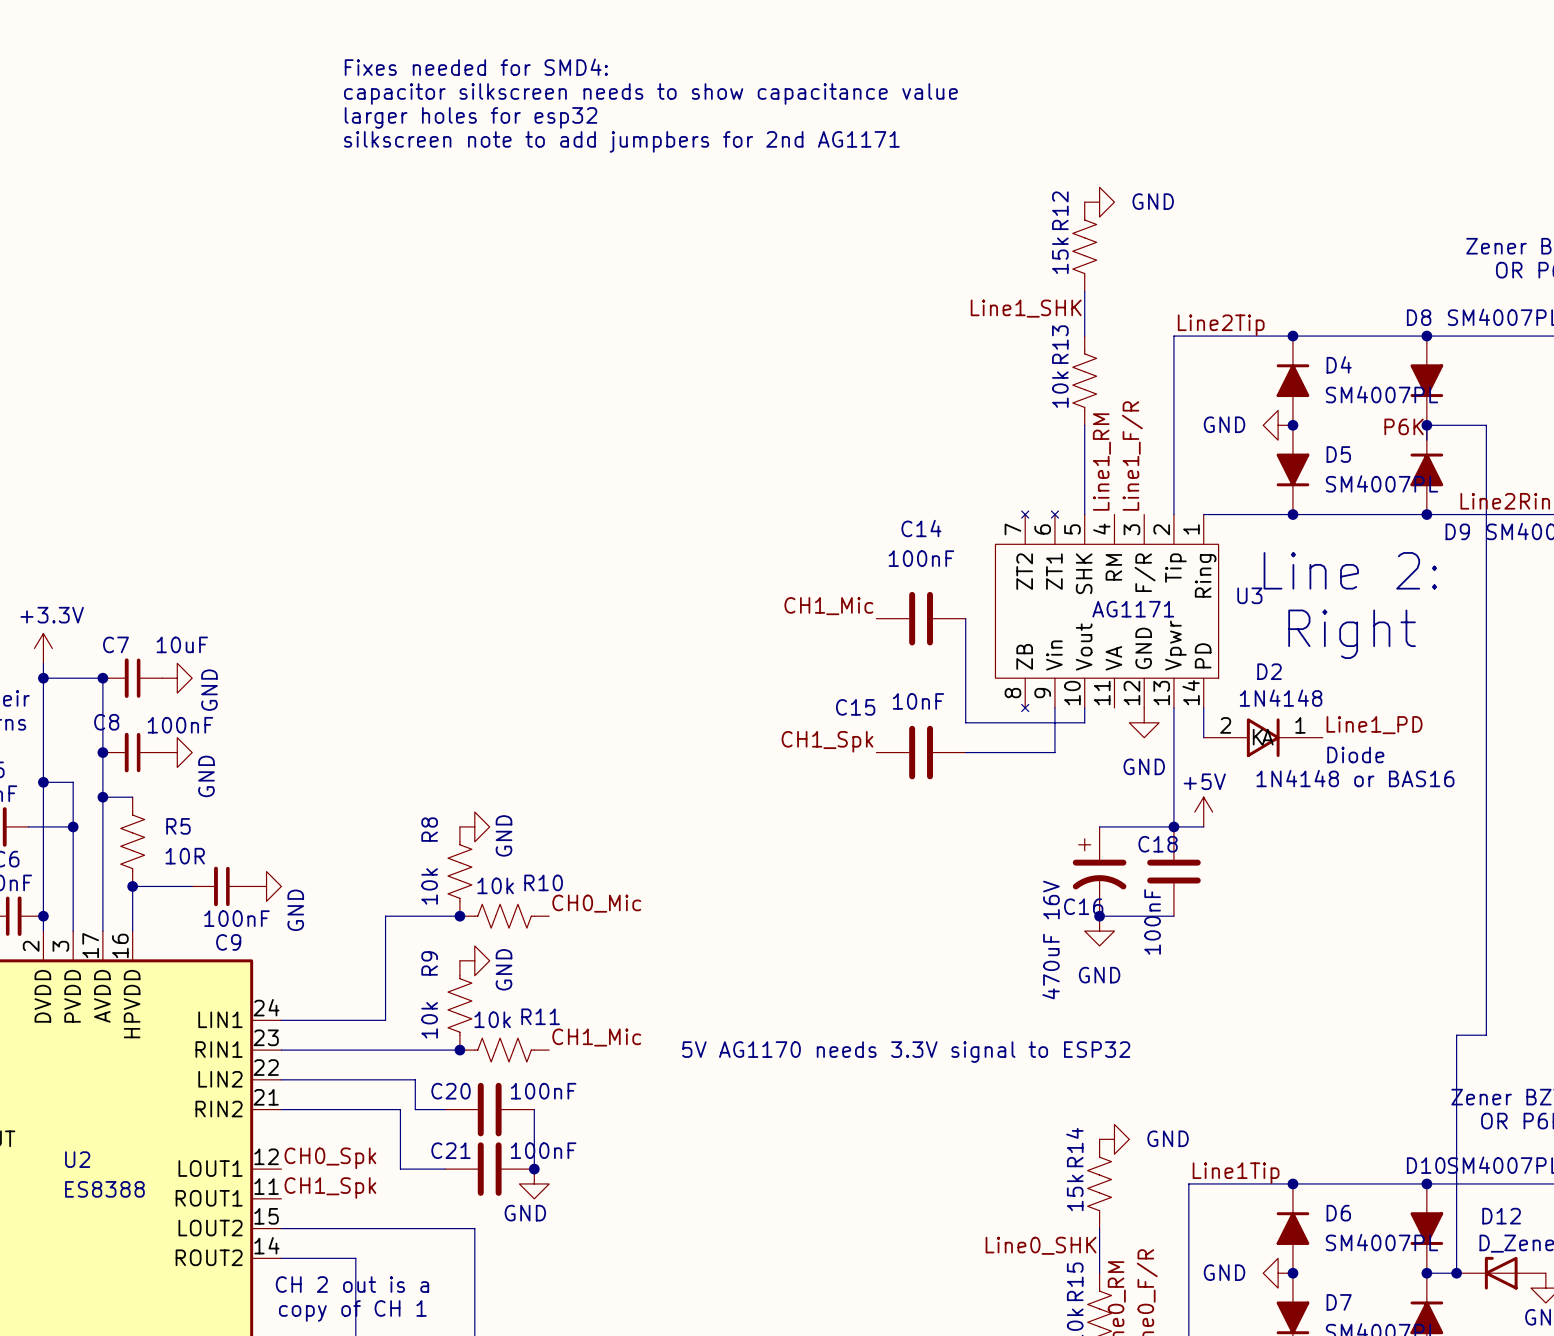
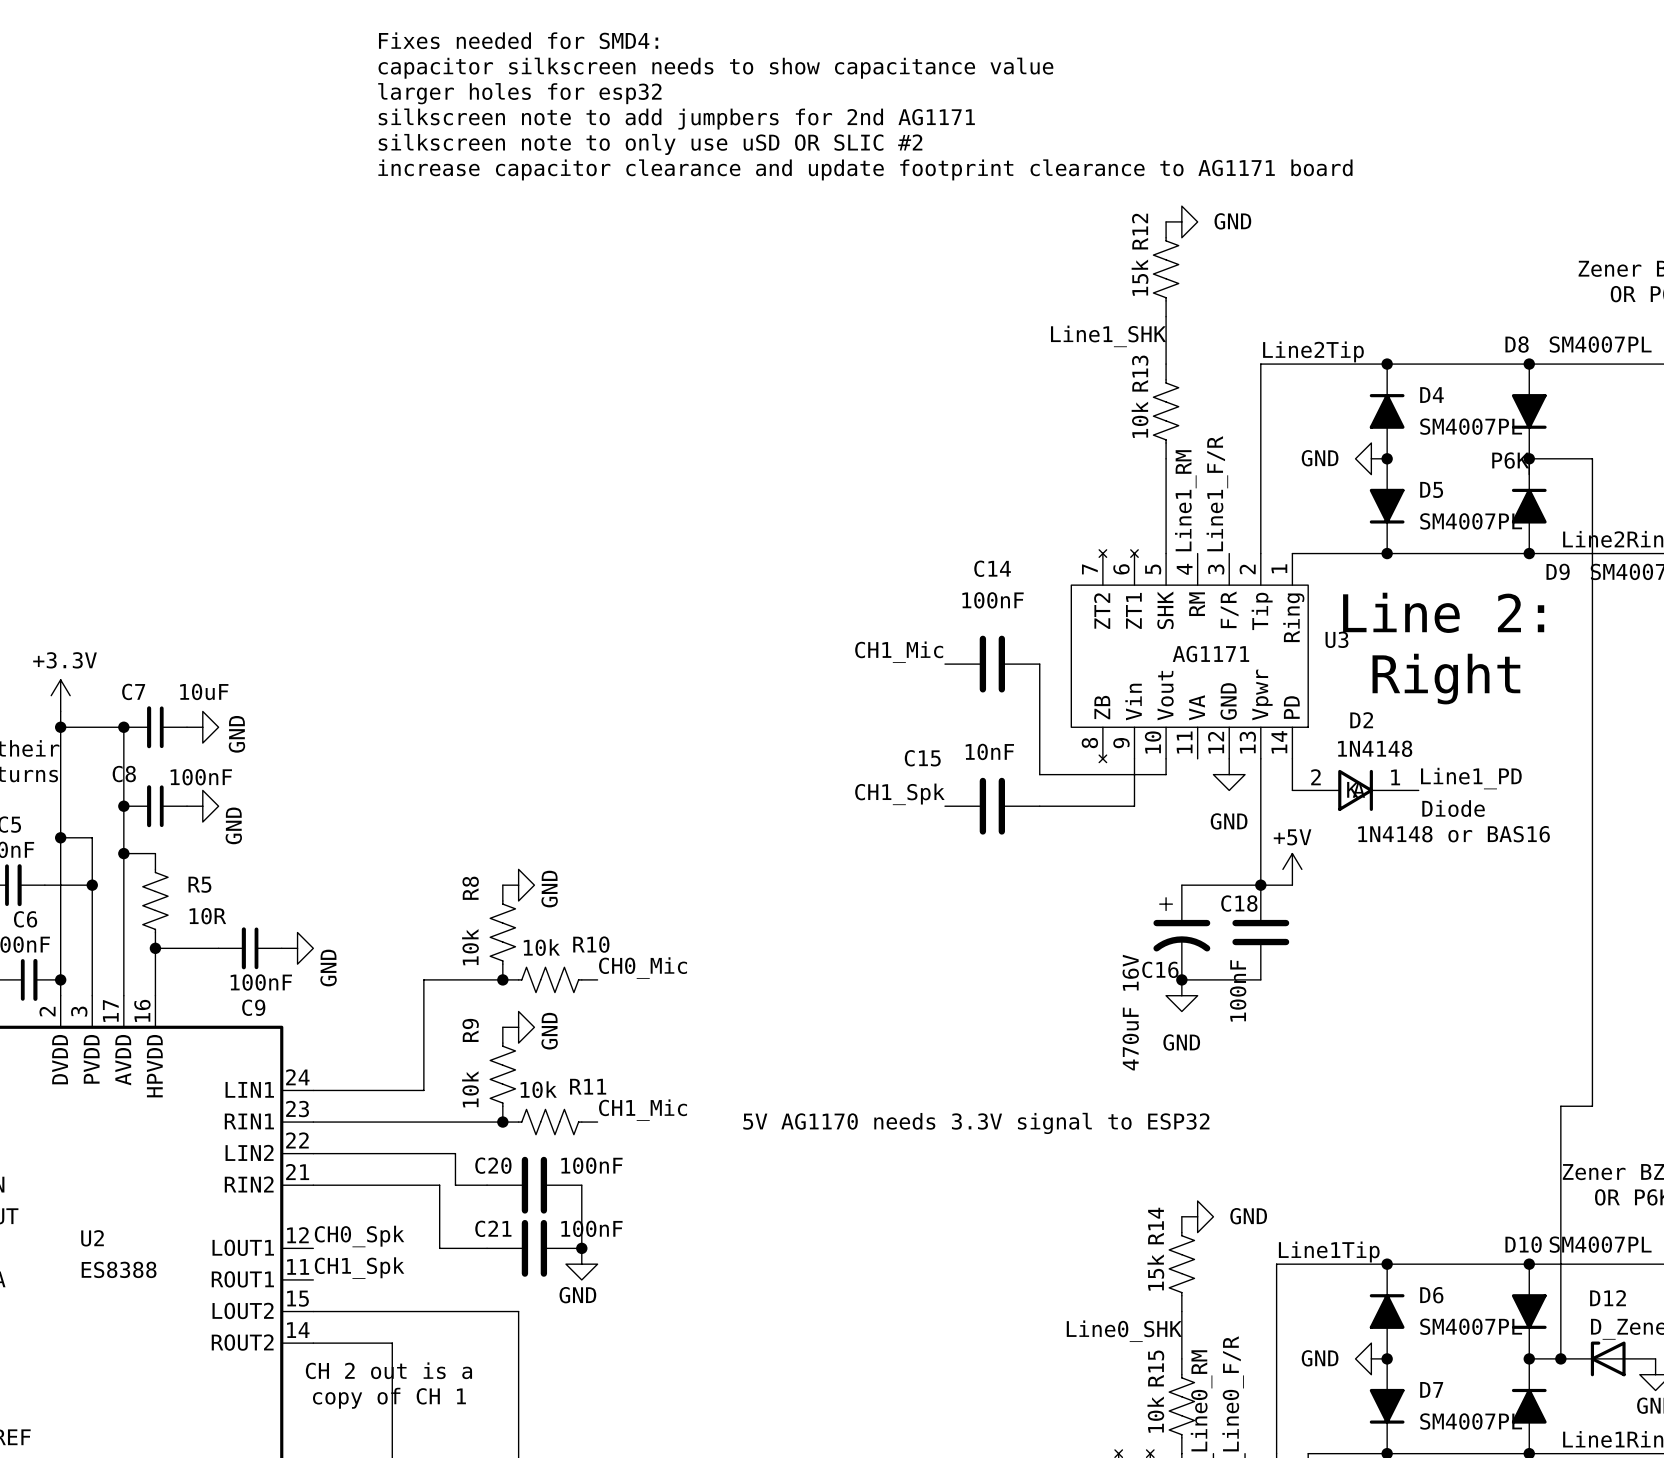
text position: Fixes needed for SMD4: (476, 67) -> Fixes needed for SMD4: (518, 40)
text position: capacitor silkscreen needs to show capacitance value (650, 93) -> capacitor silkscreen needs to show capacitance value (715, 68)
text position: larger holes for esp32 (471, 117) -> larger holes for esp32 (519, 93)
text: none -> silkscreen note to only use uSD OR SLIC #2 (650, 144)
text position: silkscreen note to add jumpbers for 2nd AG1171 (621, 141) -> silkscreen note to add jumpbers for 2nd AG1171 (676, 119)
text: none -> increase capacitor clearance and update footprint clearance to AG1171 board (865, 169)

